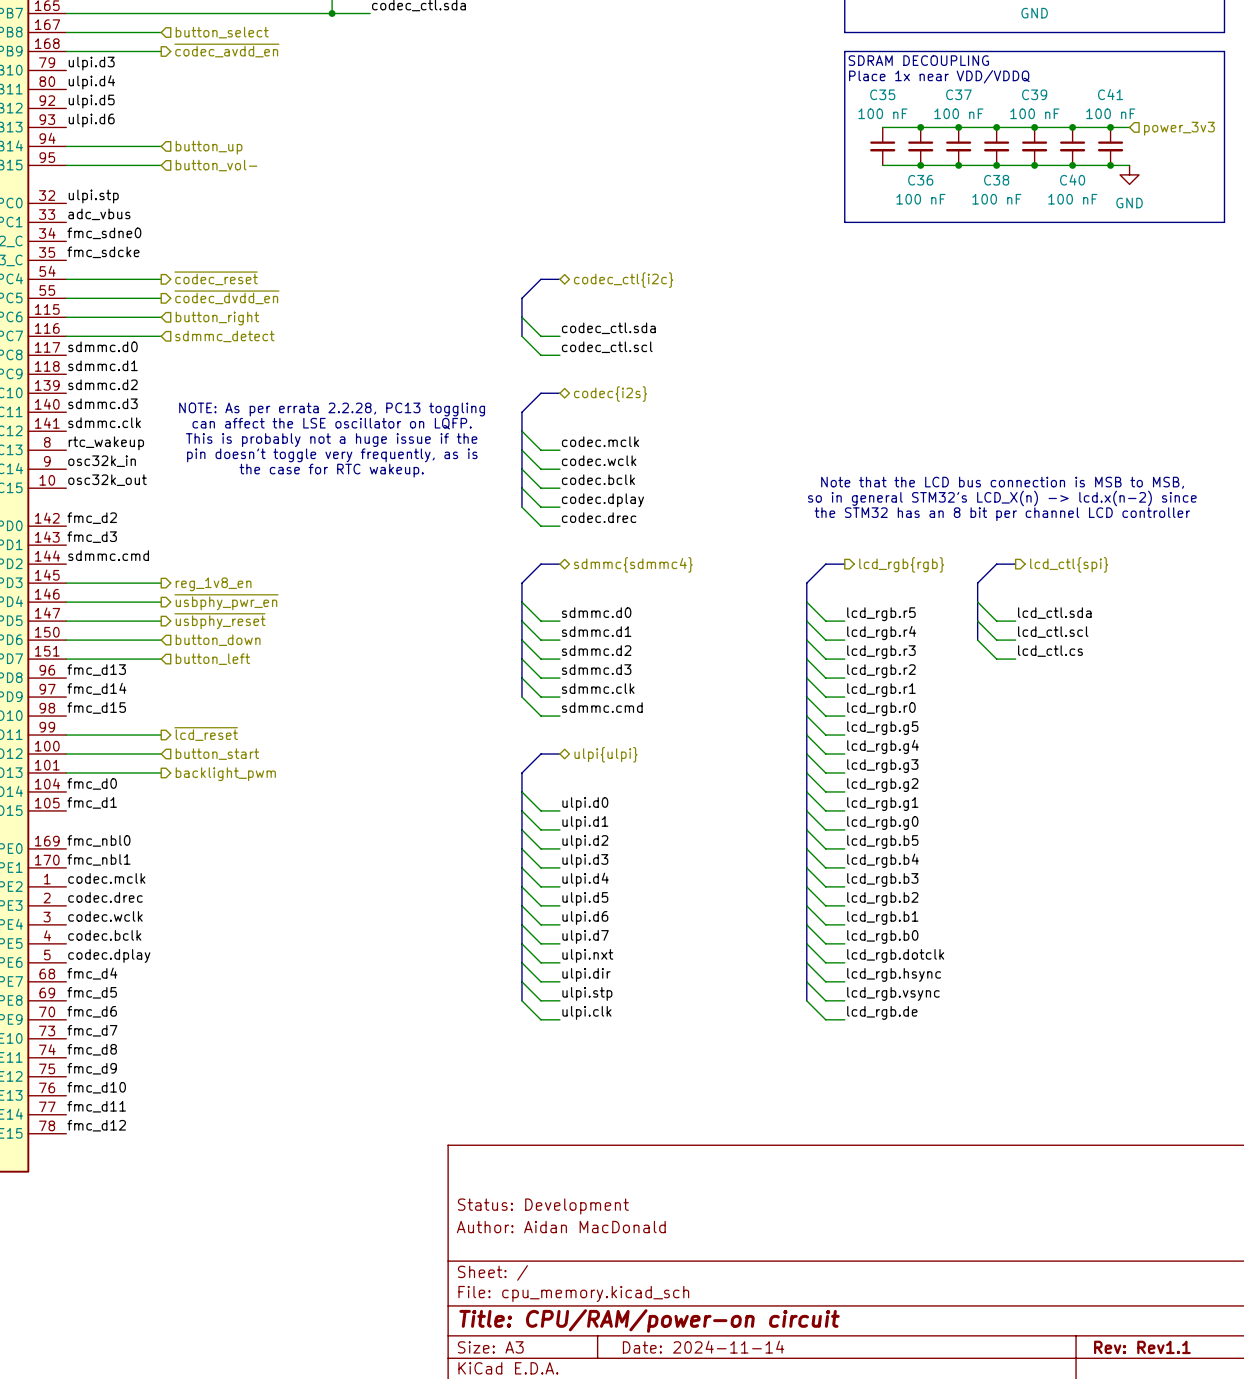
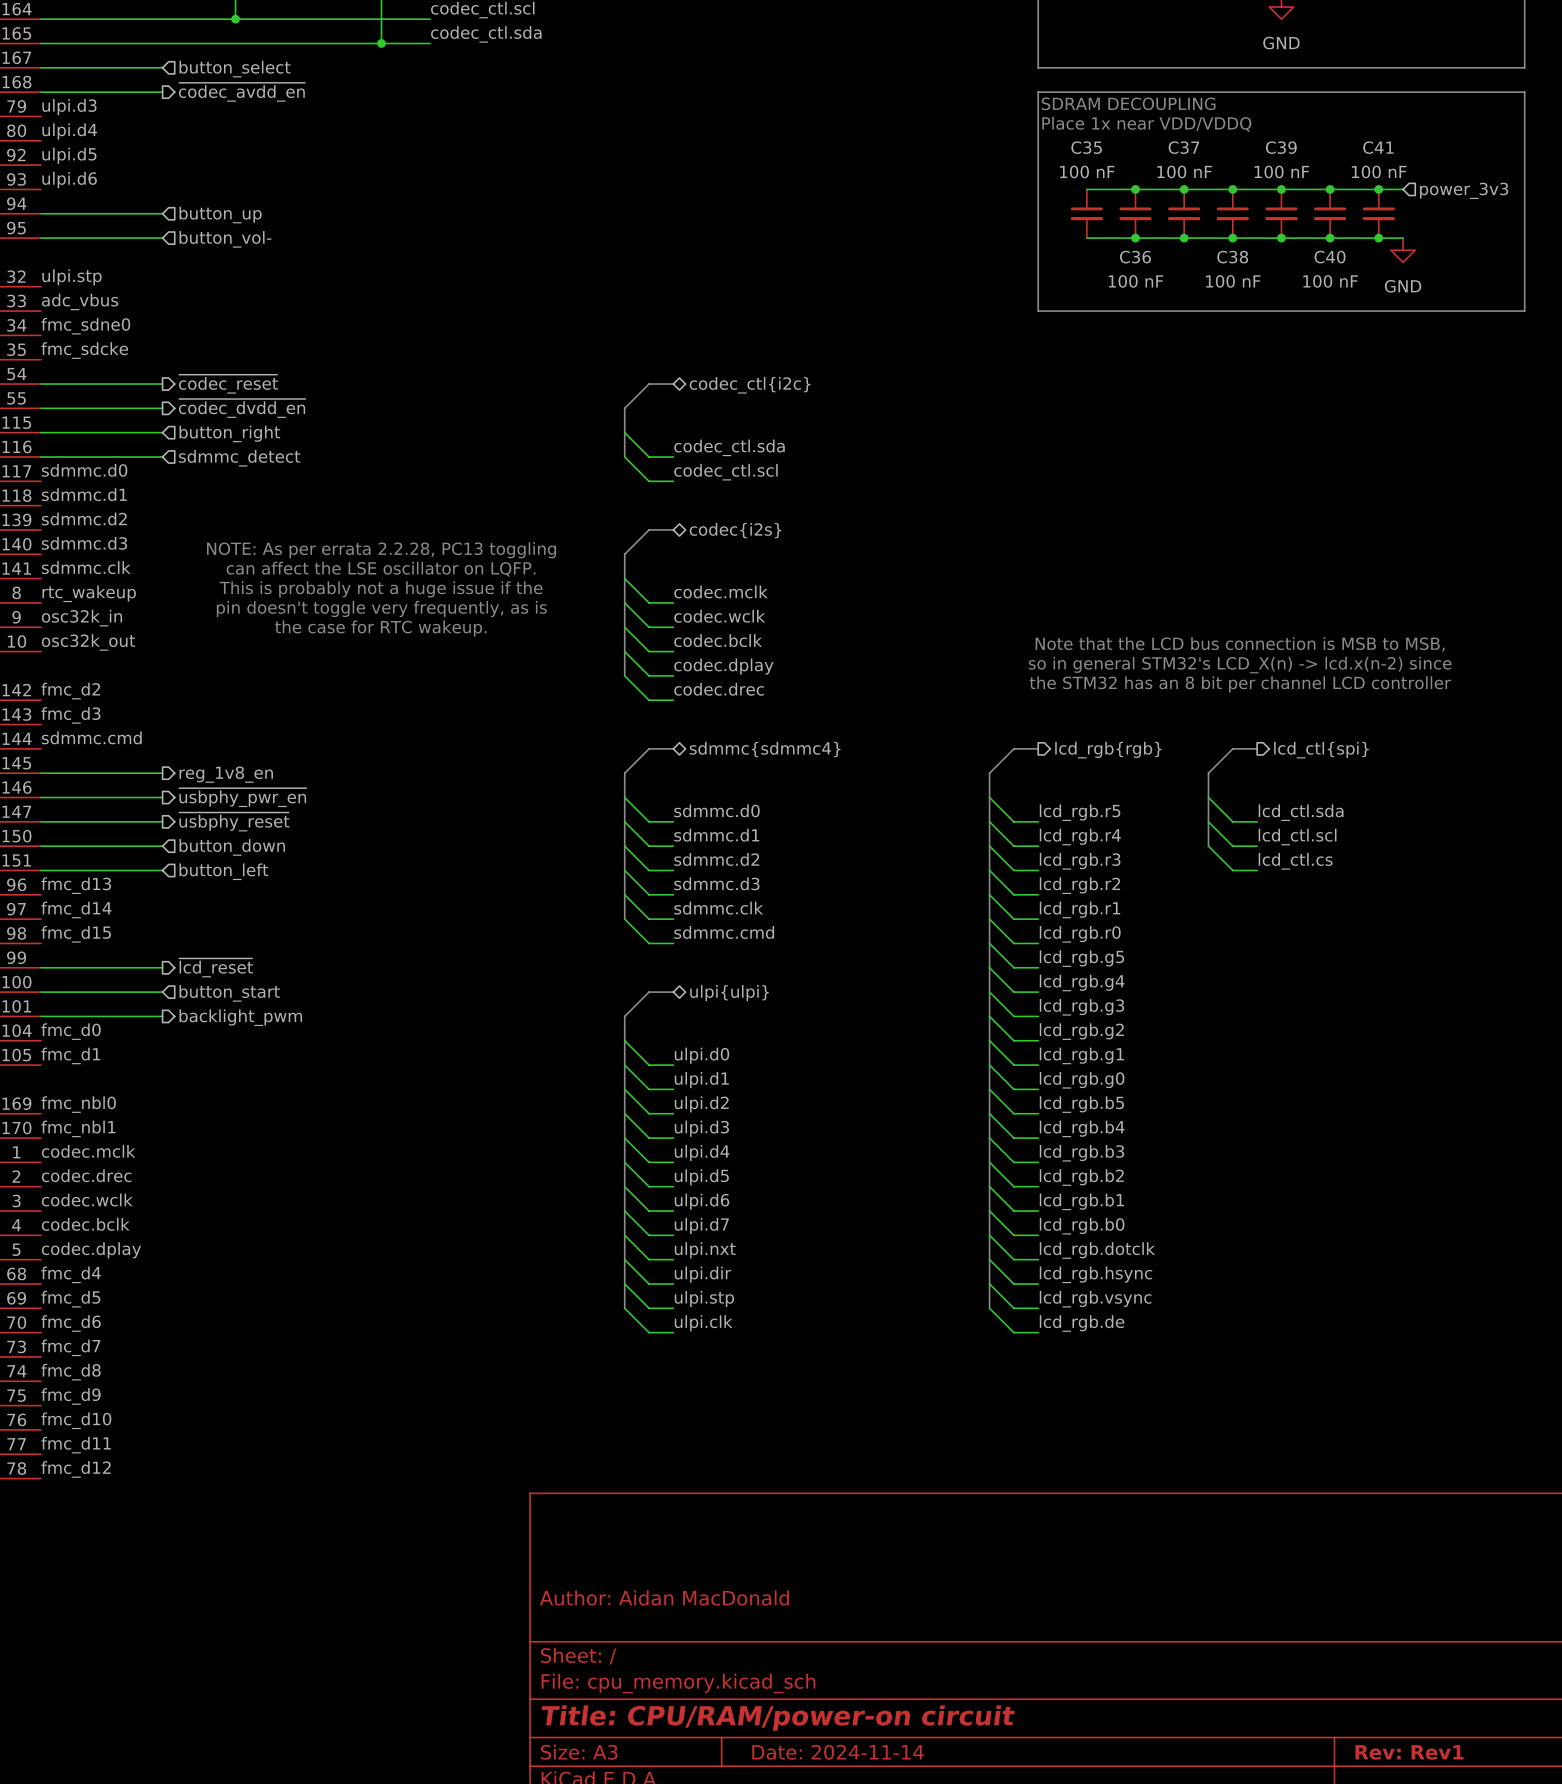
title block: Status: Development (543, 1206) -> none
title block: Rev: Rev1.1 (1142, 1347) -> Rev: Rev1 (1409, 1752)

